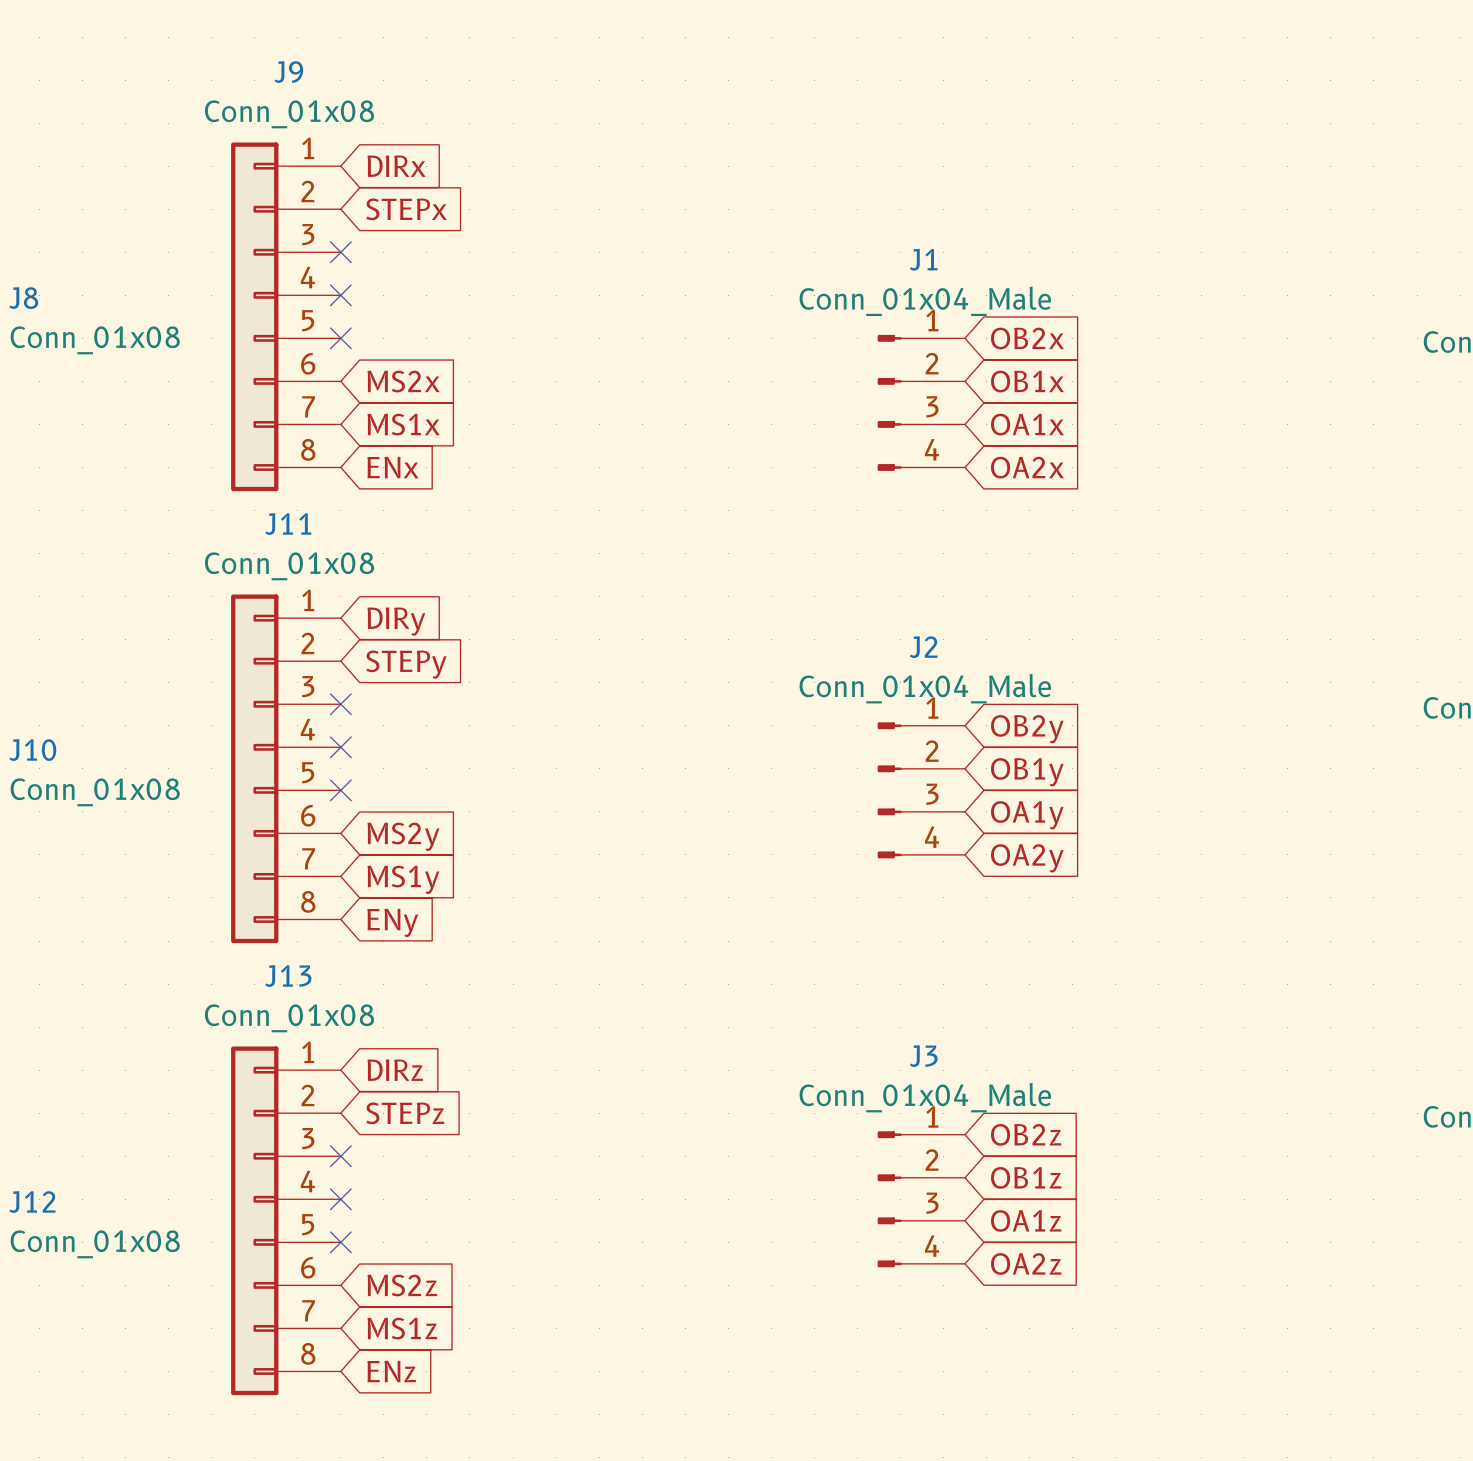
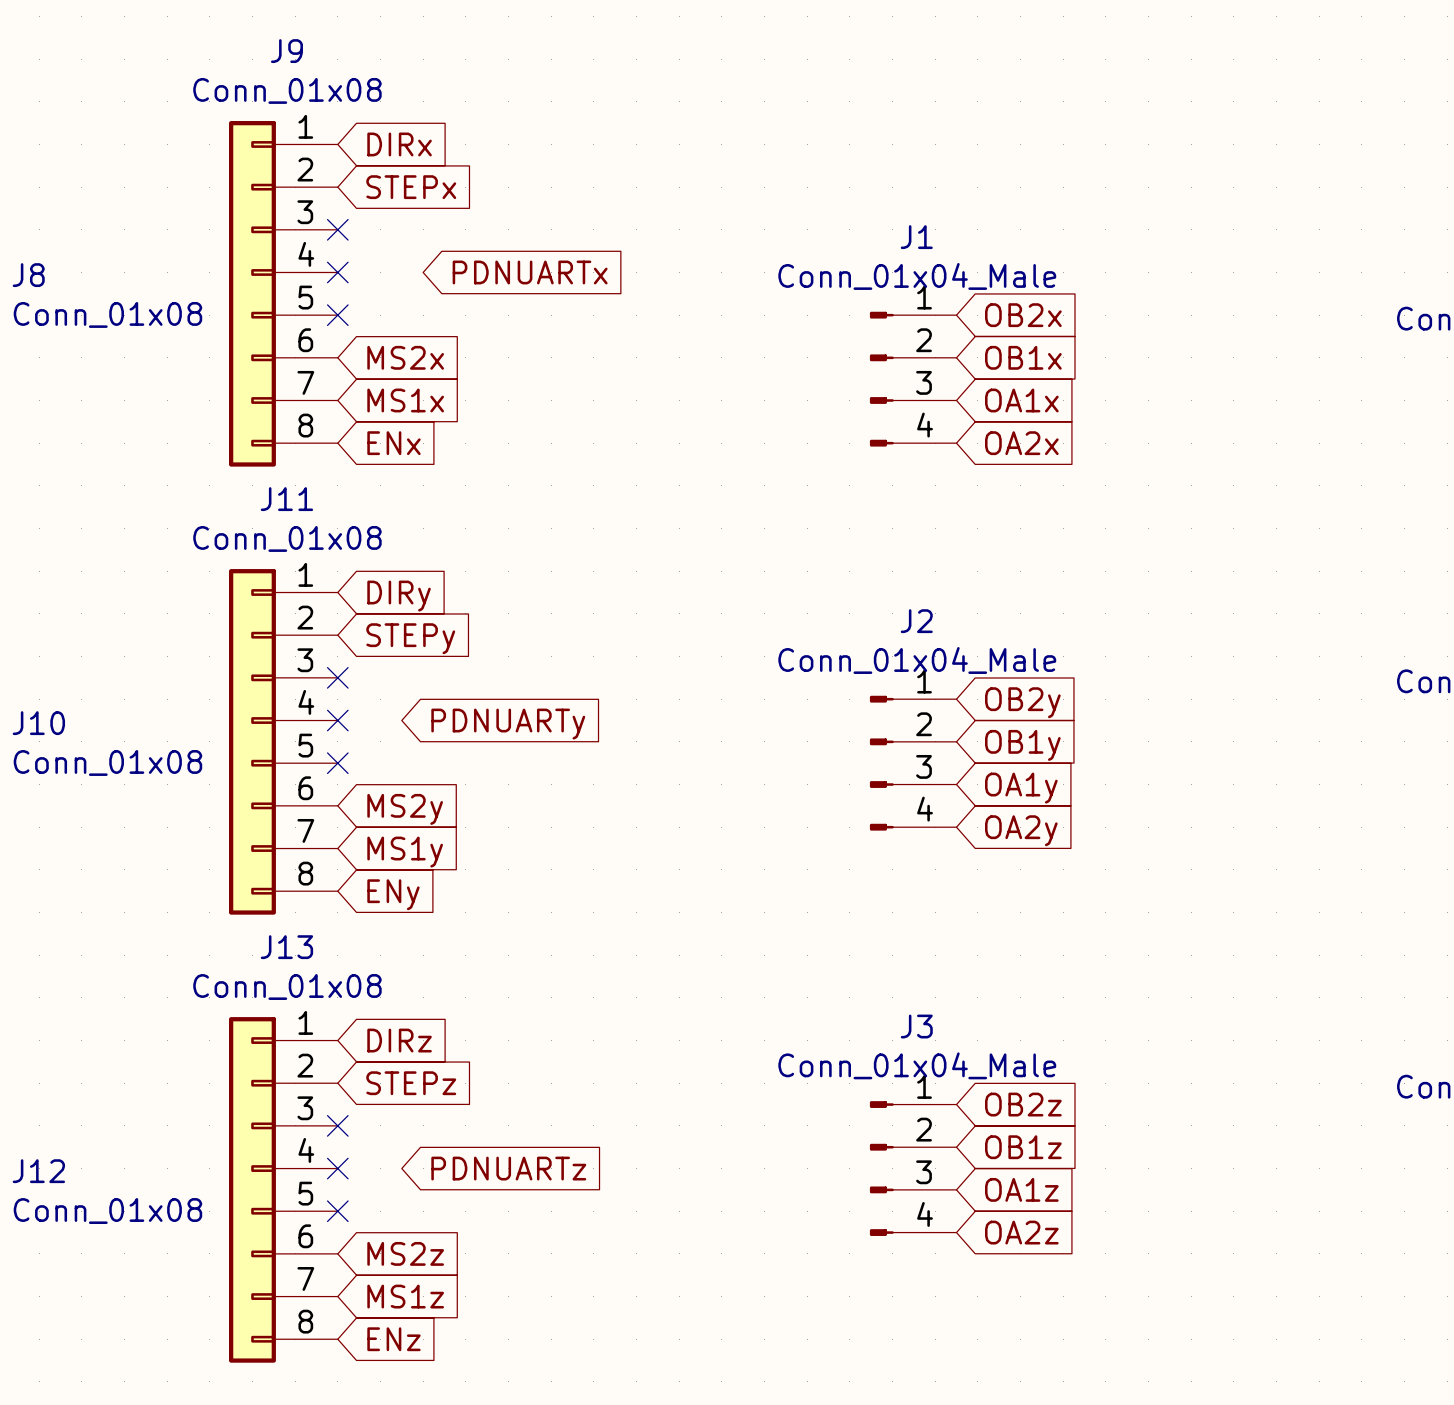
global label: none -> PDNUARTx (530, 272)
global label: none -> PDNUARTy (508, 724)
global label: none -> PDNUARTz (508, 1168)

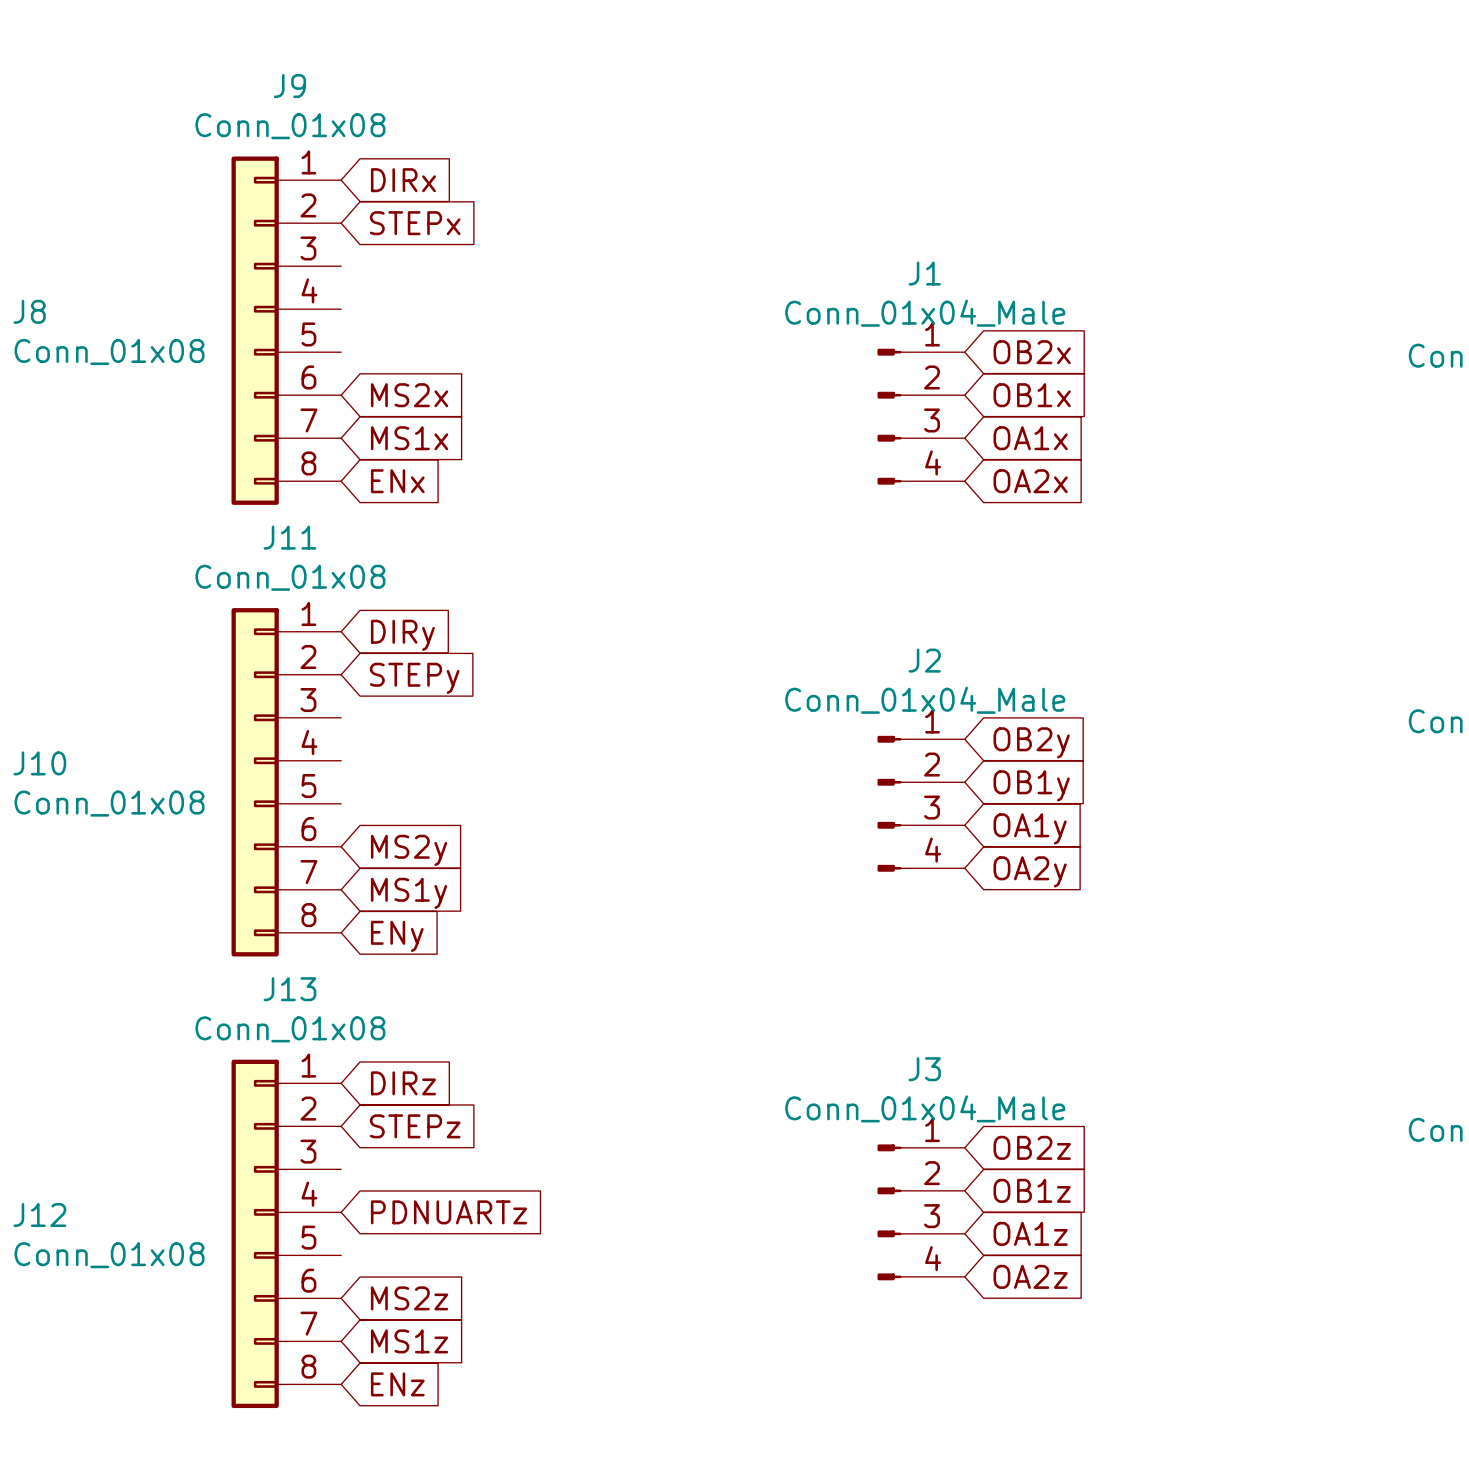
no-connect mark: (337, 229) -> none
no-connect mark: (337, 272) -> none
global label: PDNUARTx (530, 272) -> none
no-connect mark: (337, 315) -> none
no-connect mark: (337, 677) -> none
no-connect mark: (337, 720) -> none
global label: PDNUARTy (508, 724) -> none
no-connect mark: (337, 763) -> none
no-connect mark: (337, 1125) -> none
no-connect mark: (337, 1168) -> none
global label position: PDNUARTz (508, 1168) -> PDNUARTz (448, 1212)
no-connect mark: (337, 1211) -> none

